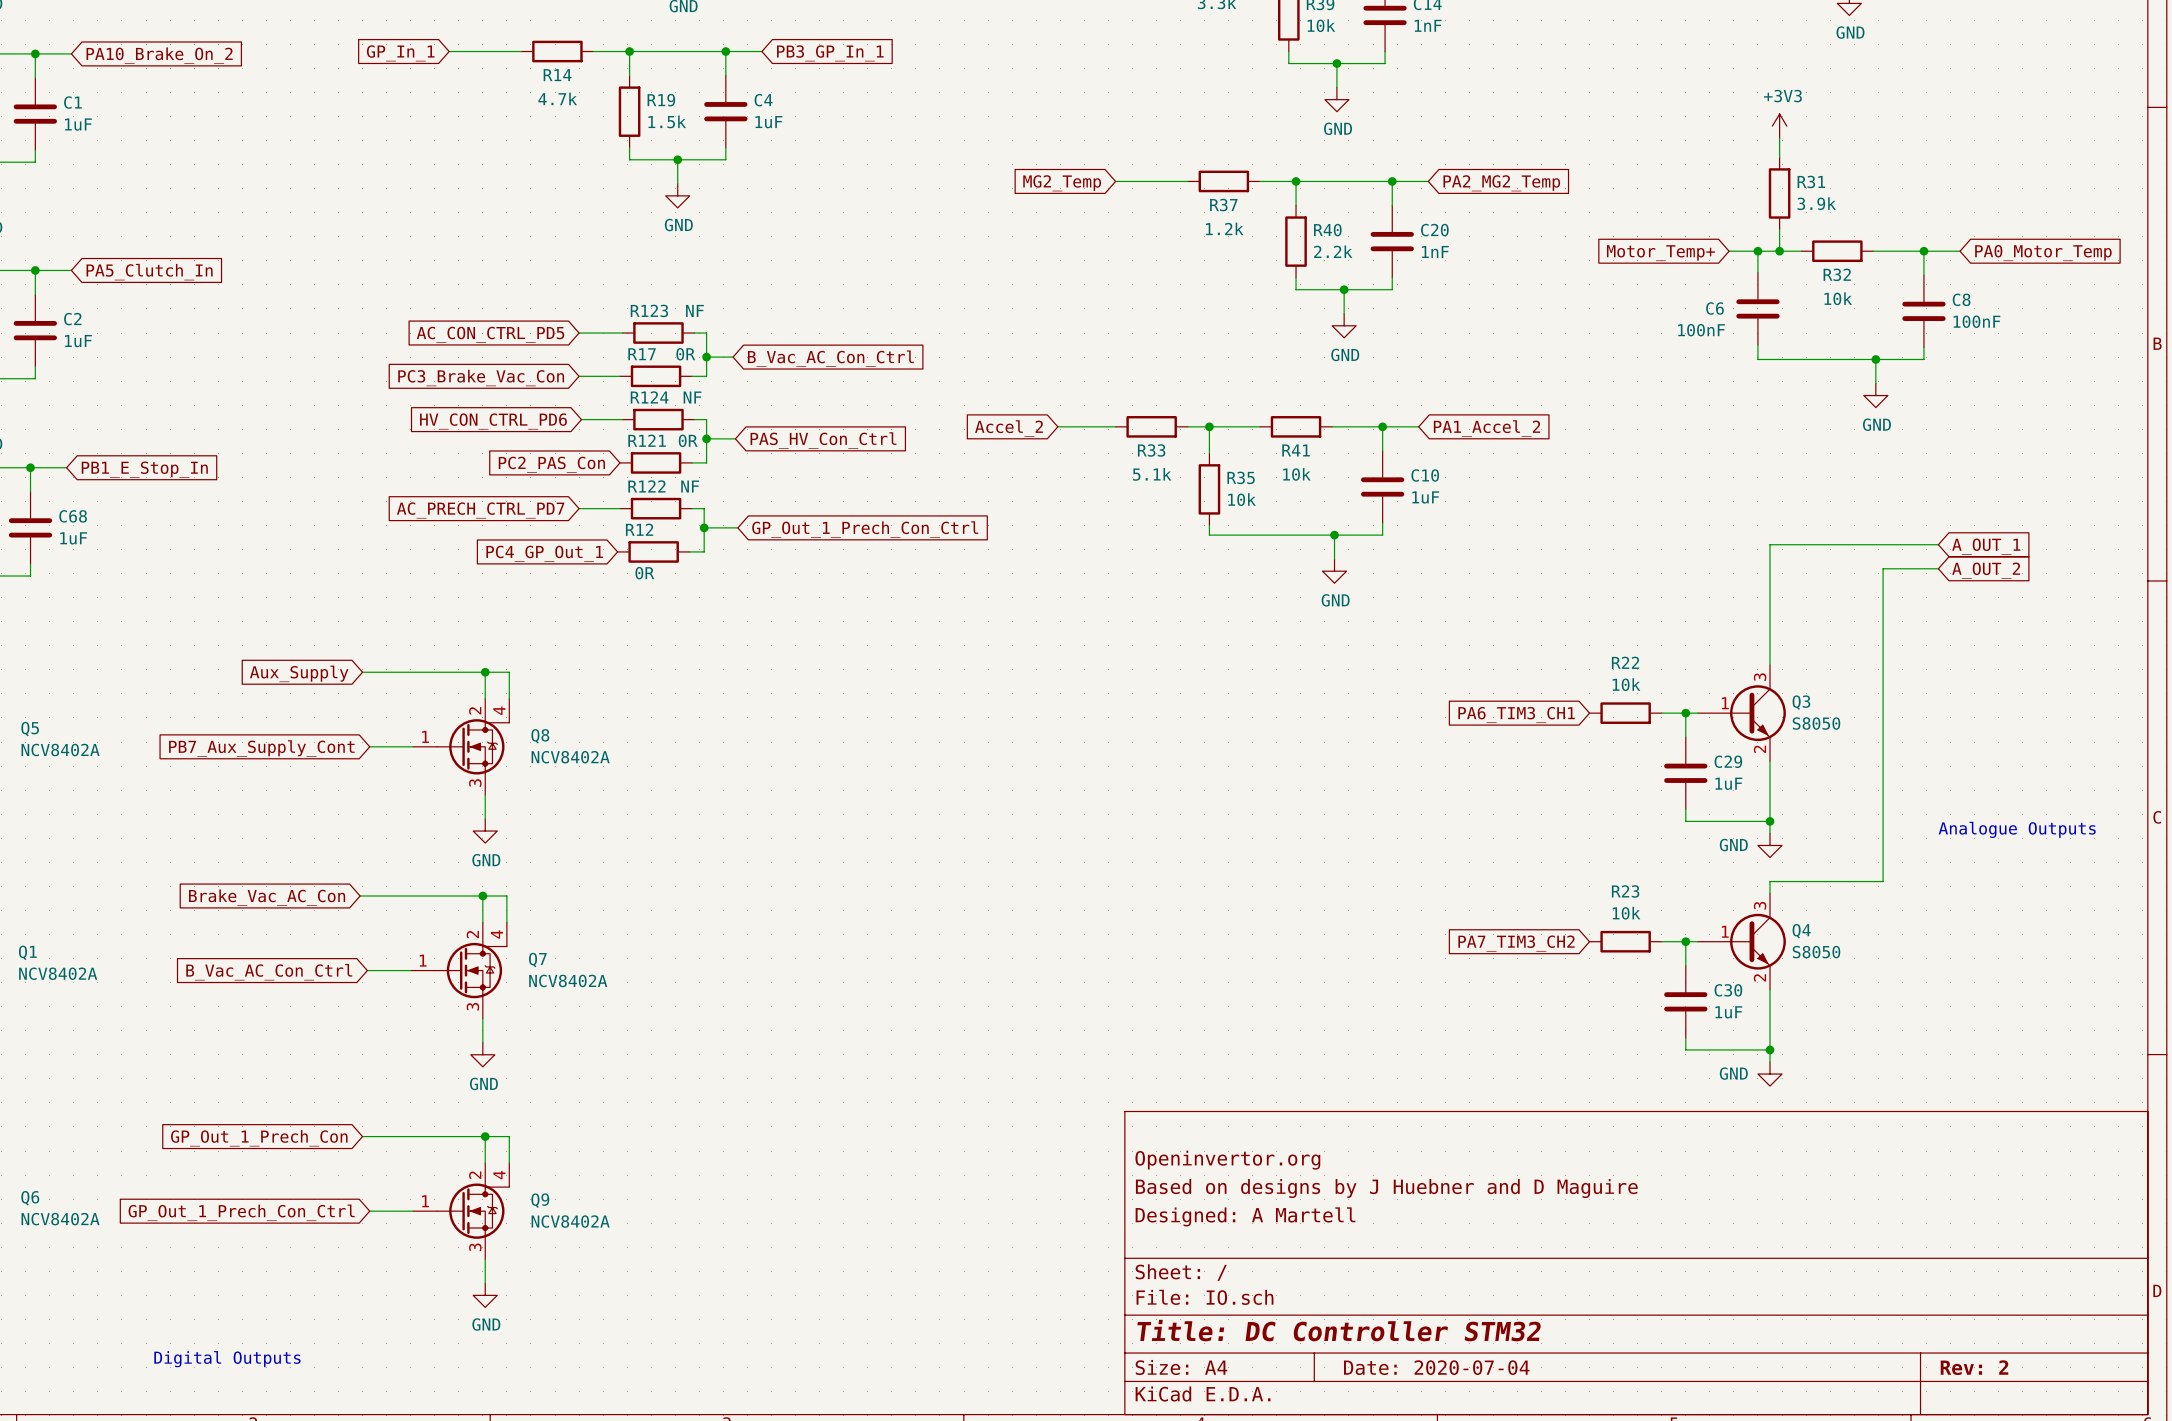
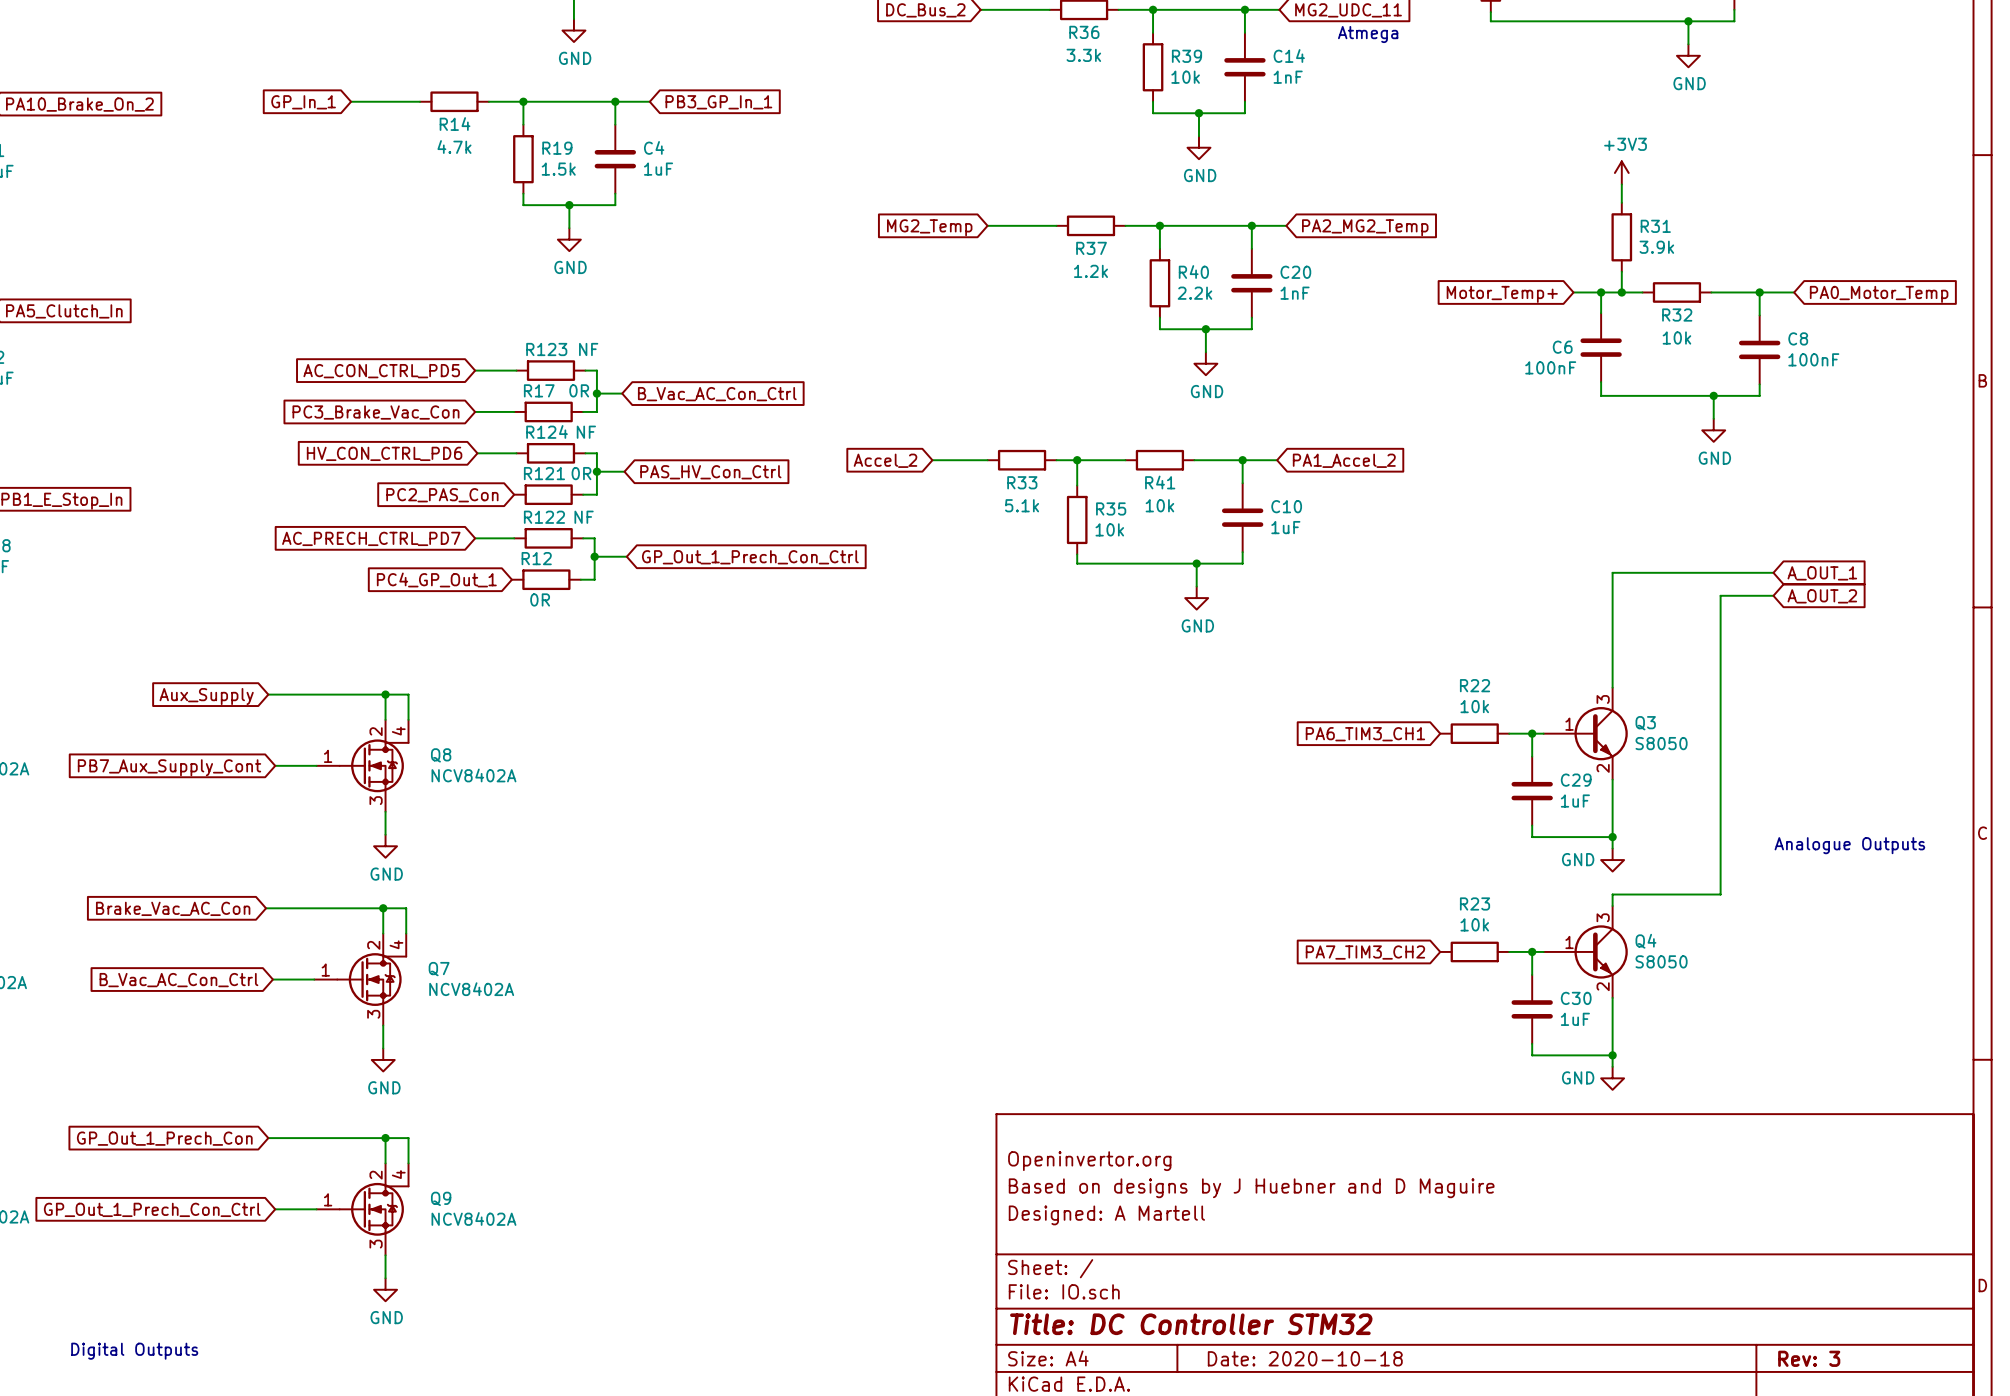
title block: Date: 2020-07-04 (1436, 1367) -> Date: 2020-10-18 (1305, 1358)
title block: Rev: 2 (1974, 1367) -> Rev: 3 (1809, 1358)

